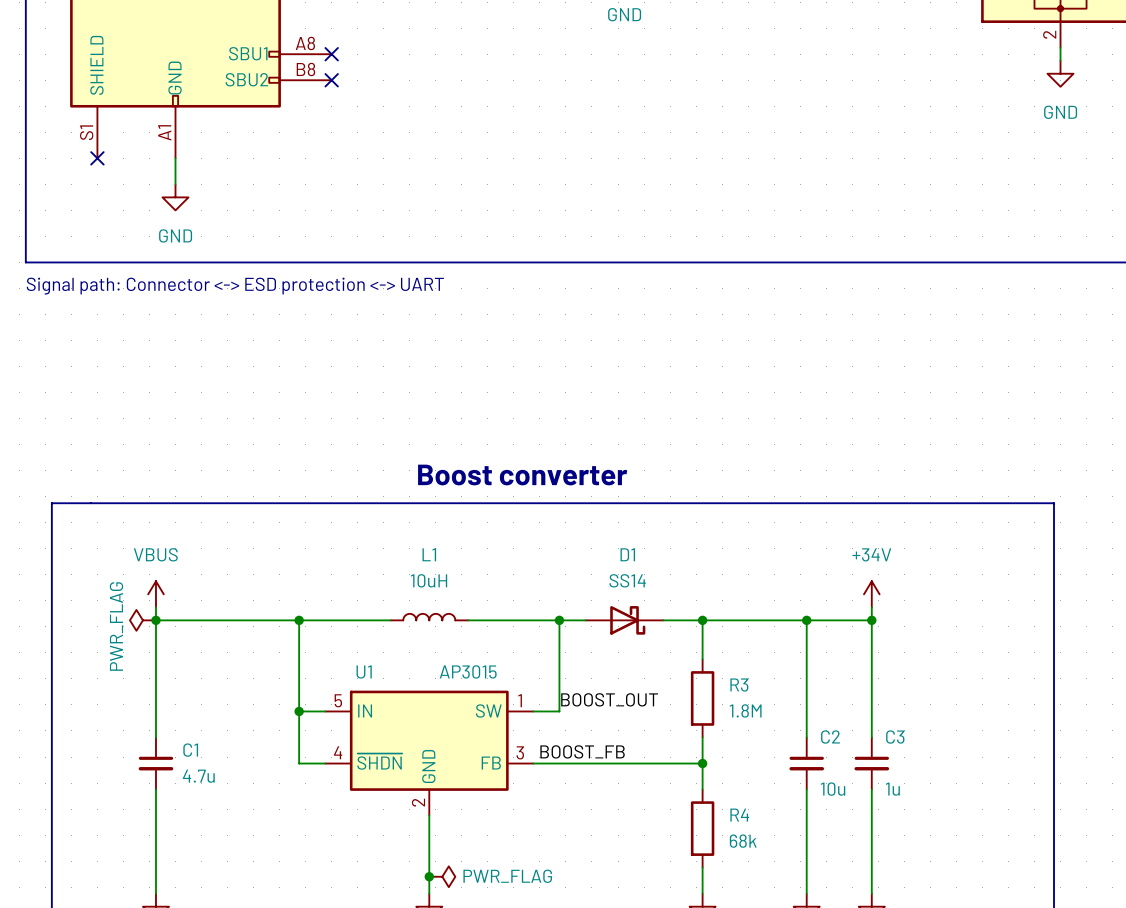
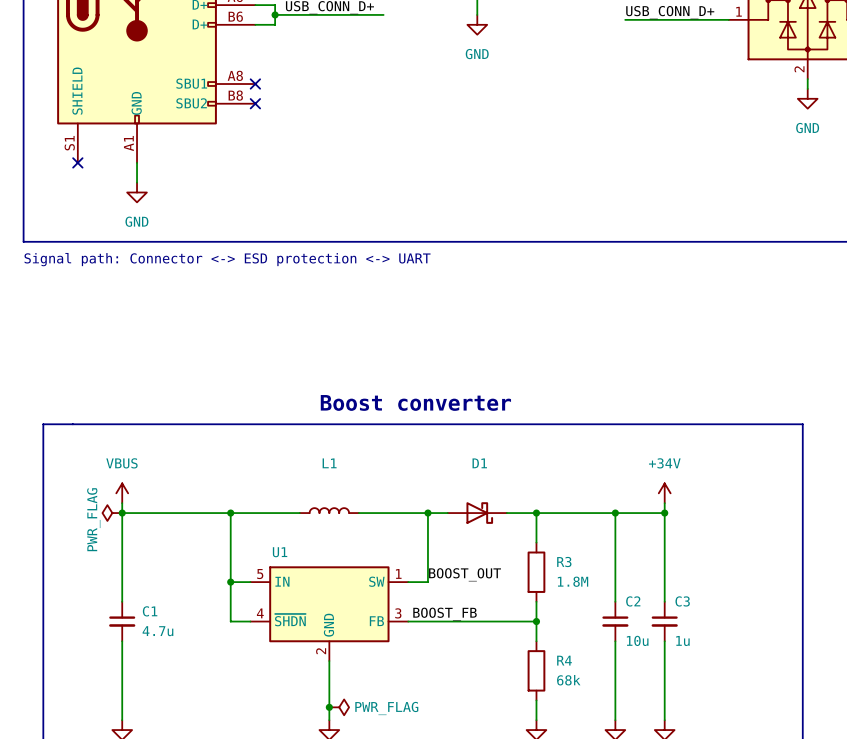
L1 value: 10uH (428, 580) -> none
D1 value: SS14 (627, 580) -> none
U1 value: AP3015 (468, 671) -> none

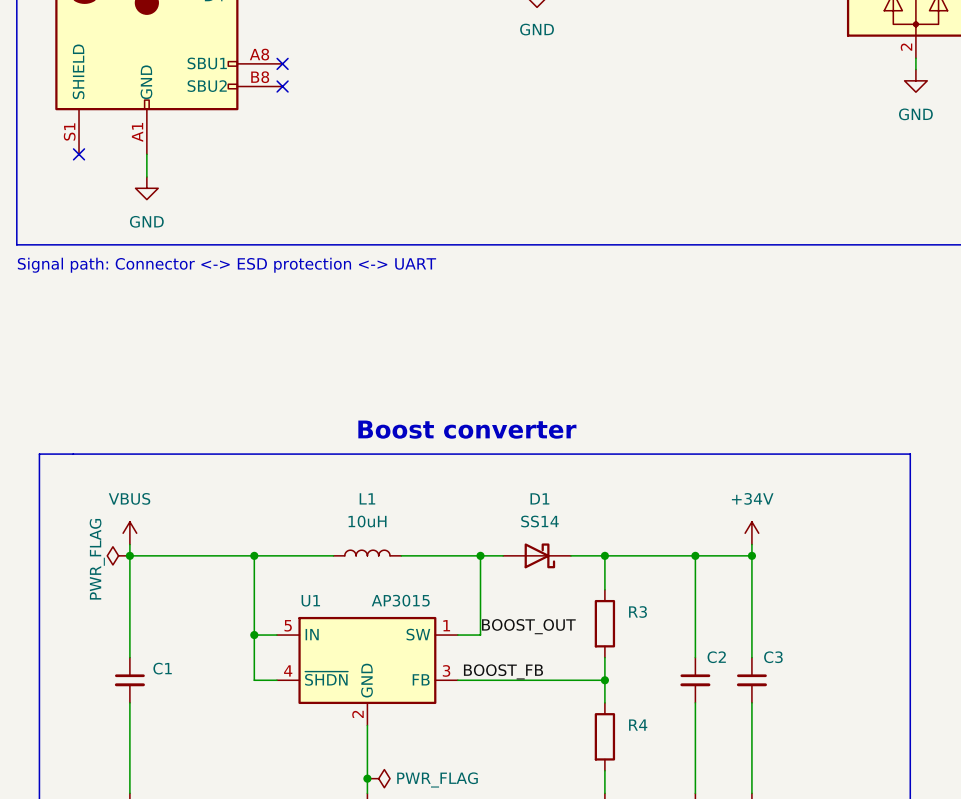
L1 value: none -> 10uH (367, 521)
D1 value: none -> SS14 (539, 521)
U1 value: none -> AP3015 (400, 600)
R3 value: 1.8M (573, 581) -> none
C1 value: 4.7u (157, 631) -> none
C2 value: 10u (637, 640) -> none
C3 value: 1u (682, 640) -> none
R4 value: 68k (568, 680) -> none

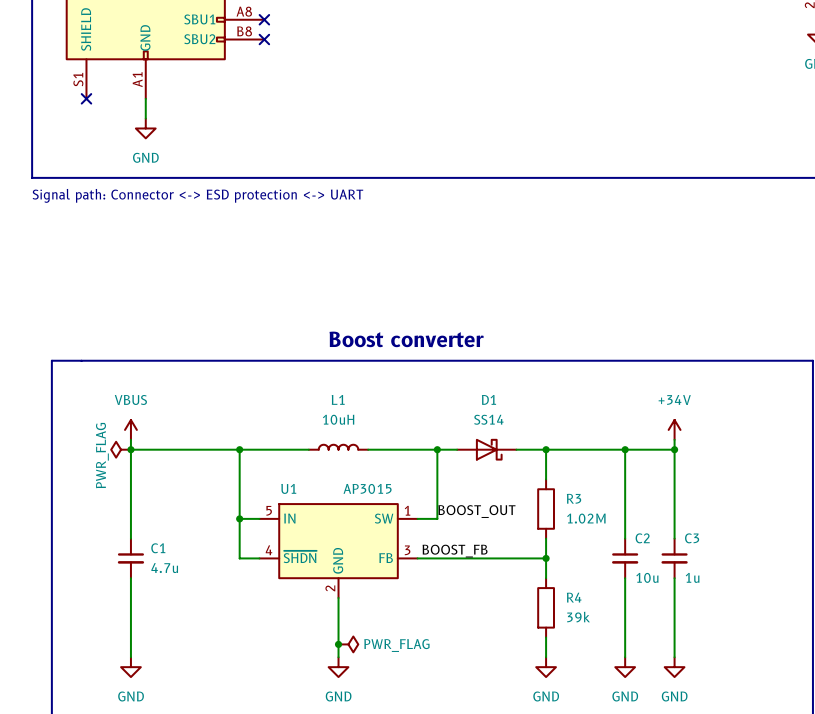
R3 value: none -> 1.02M (586, 518)
C1 value: none -> 4.7u (164, 568)
C2 value: none -> 10u (647, 577)
C3 value: none -> 1u (692, 577)
R4 value: none -> 39k (578, 617)

